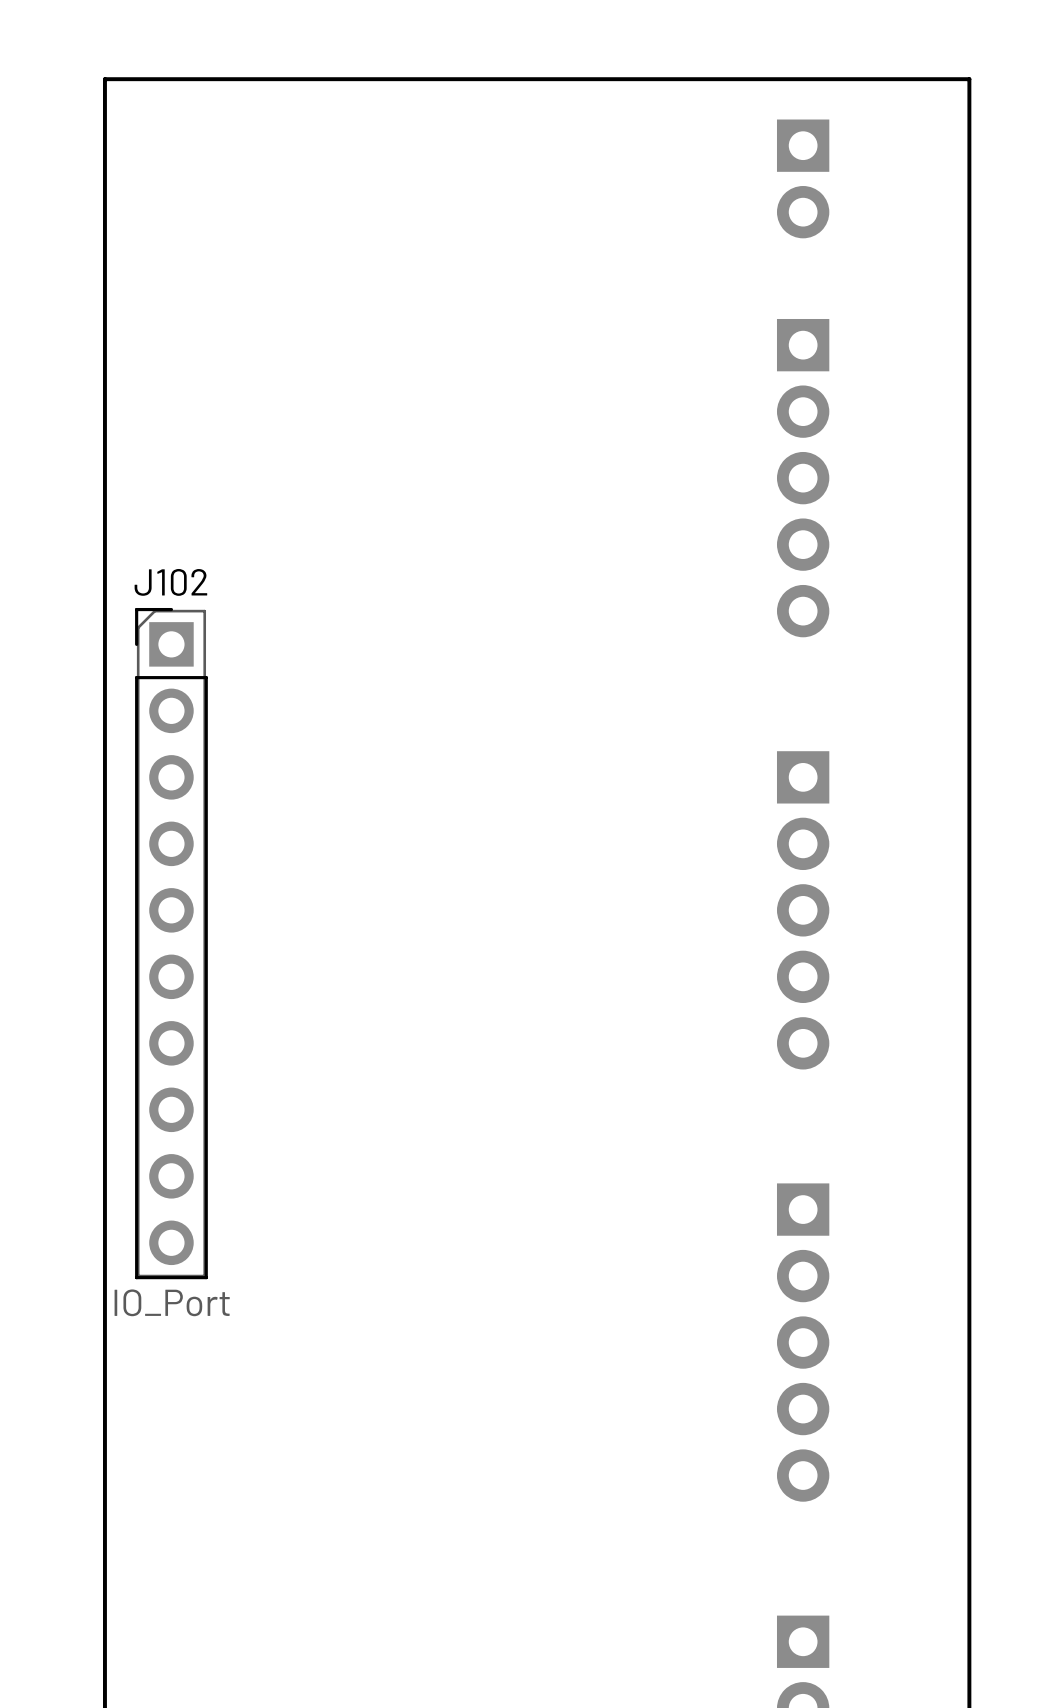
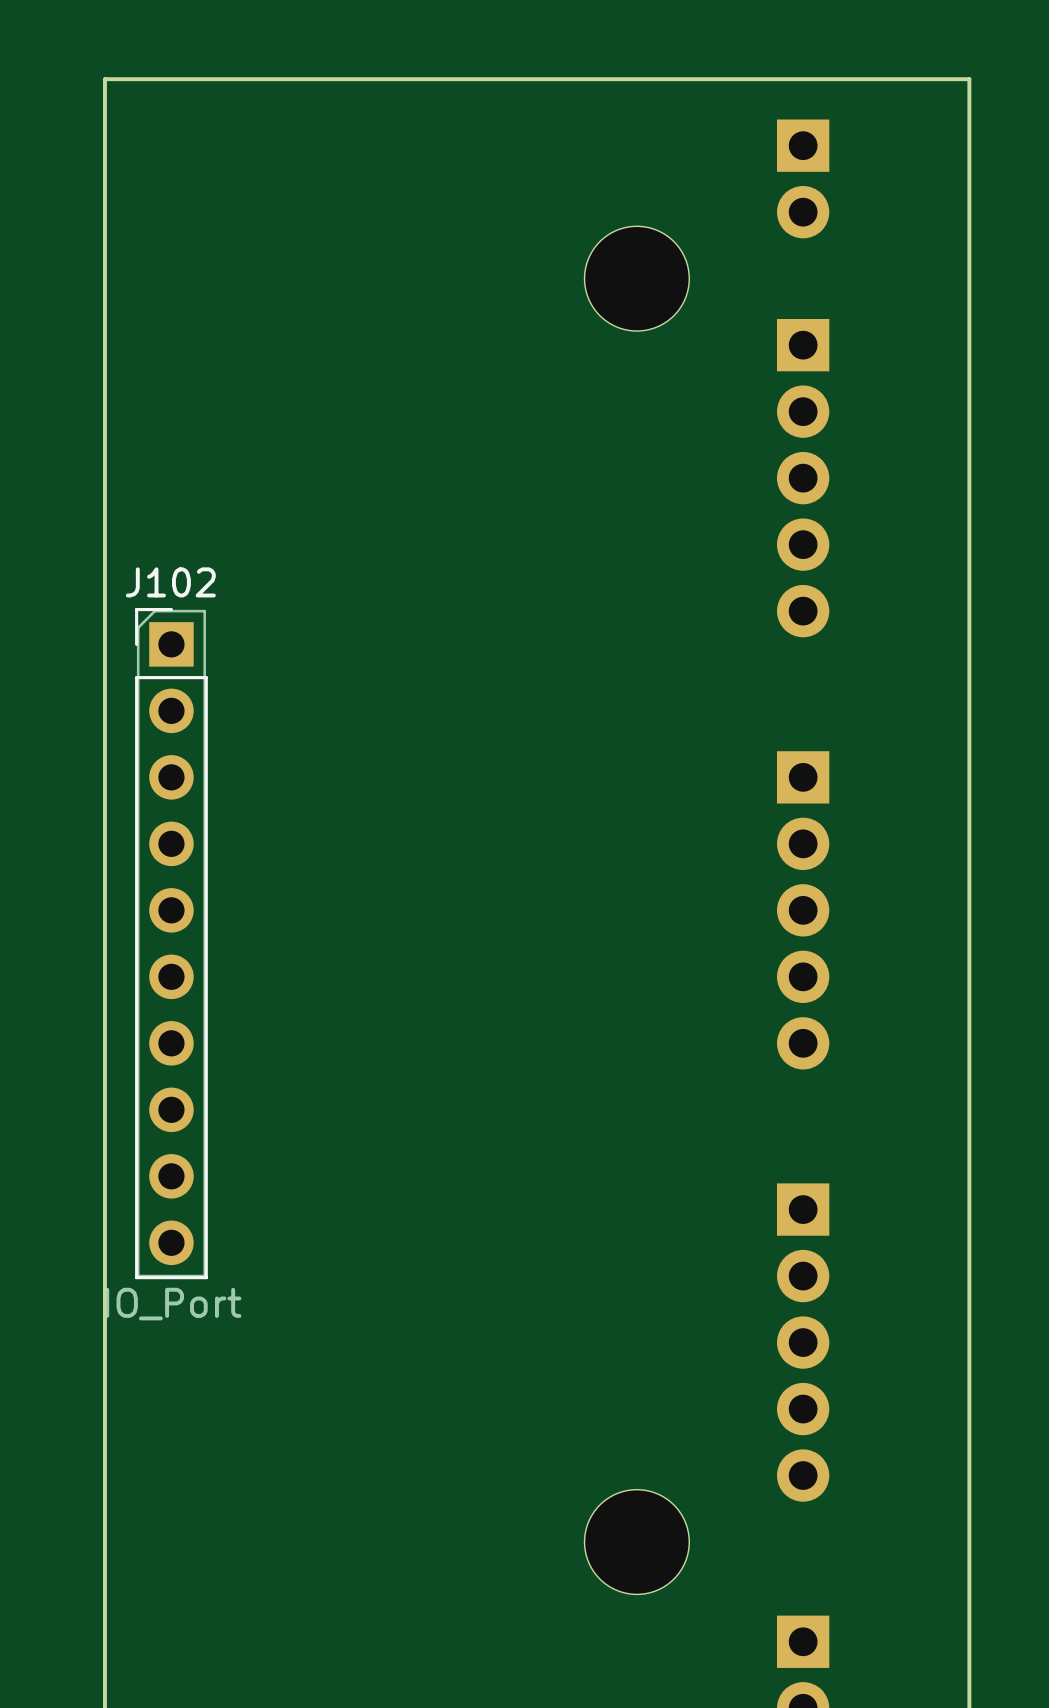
part: none -> (636, 278)
part: none -> (636, 1542)

